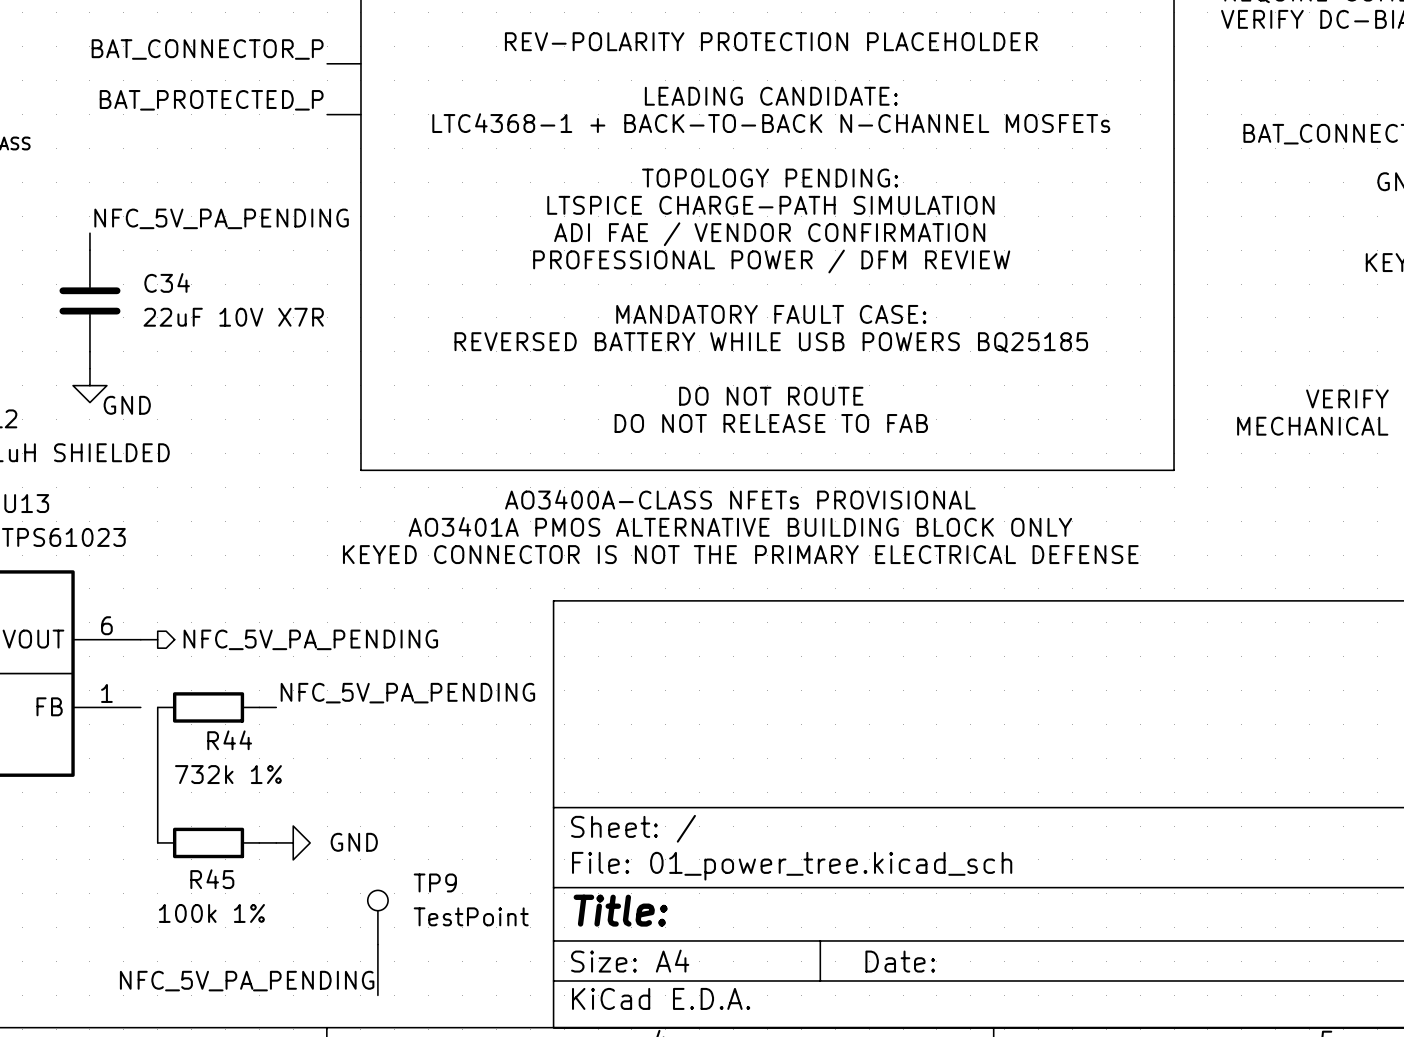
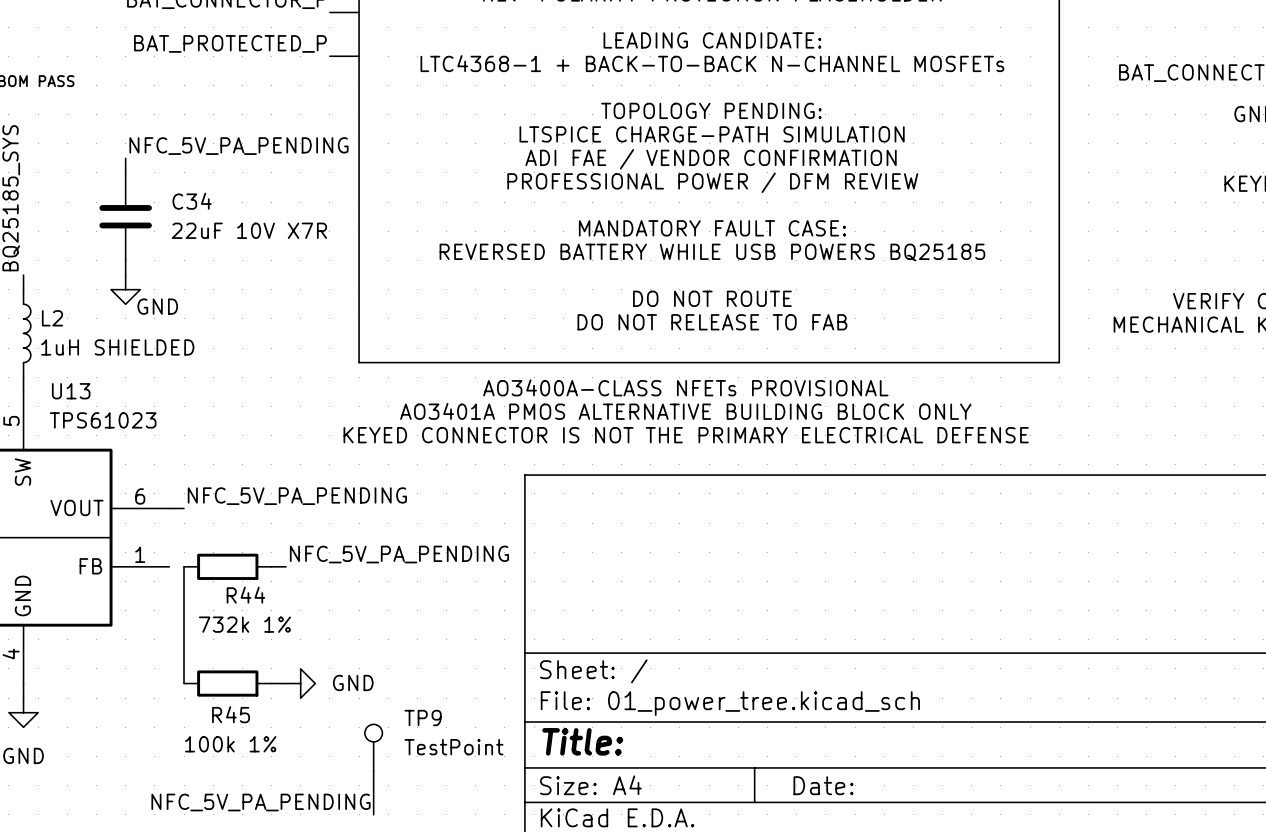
label: none -> NFC_5V_PA_PENDING (297, 496)
hierarchical label: NFC_5V_PA_PENDING (310, 639) -> none

